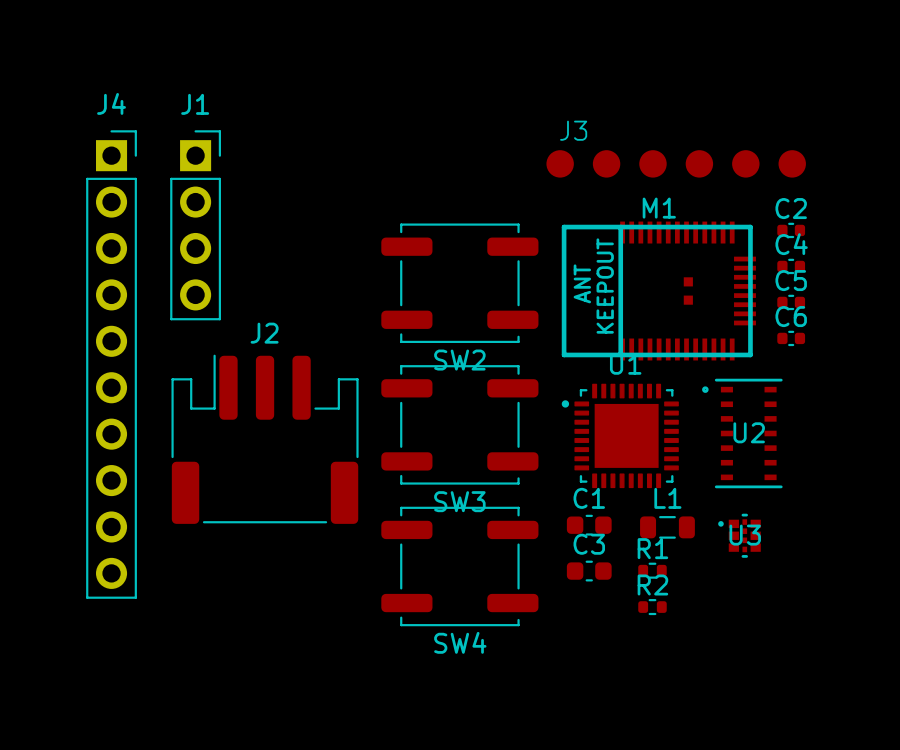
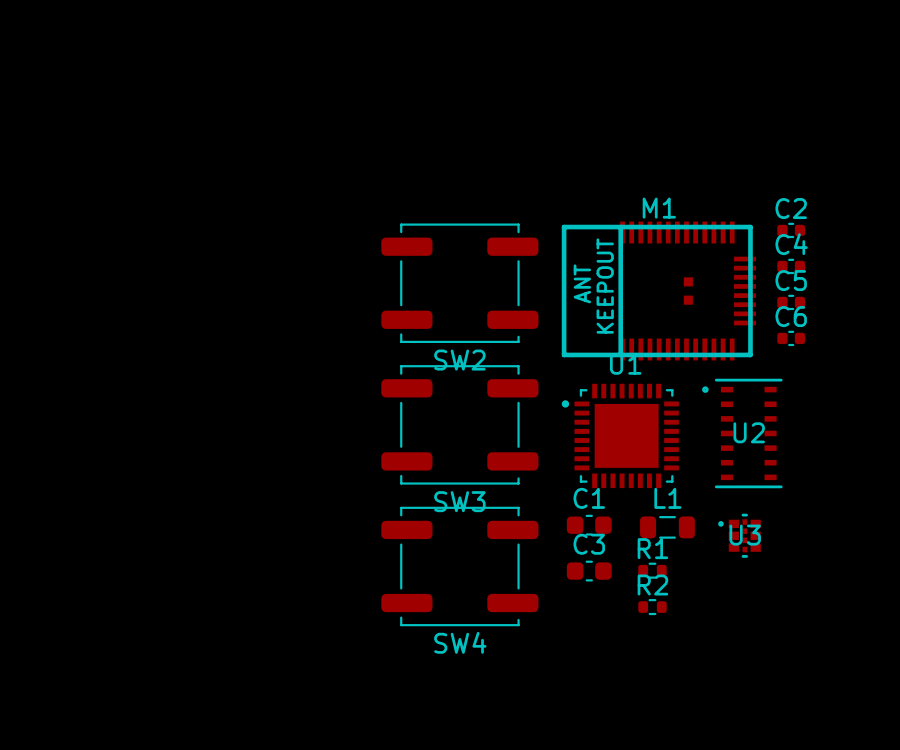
J3: (676, 163) -> none
J1: (195, 225) -> none
J4: (111, 364) -> none
J2: (265, 439) -> none

